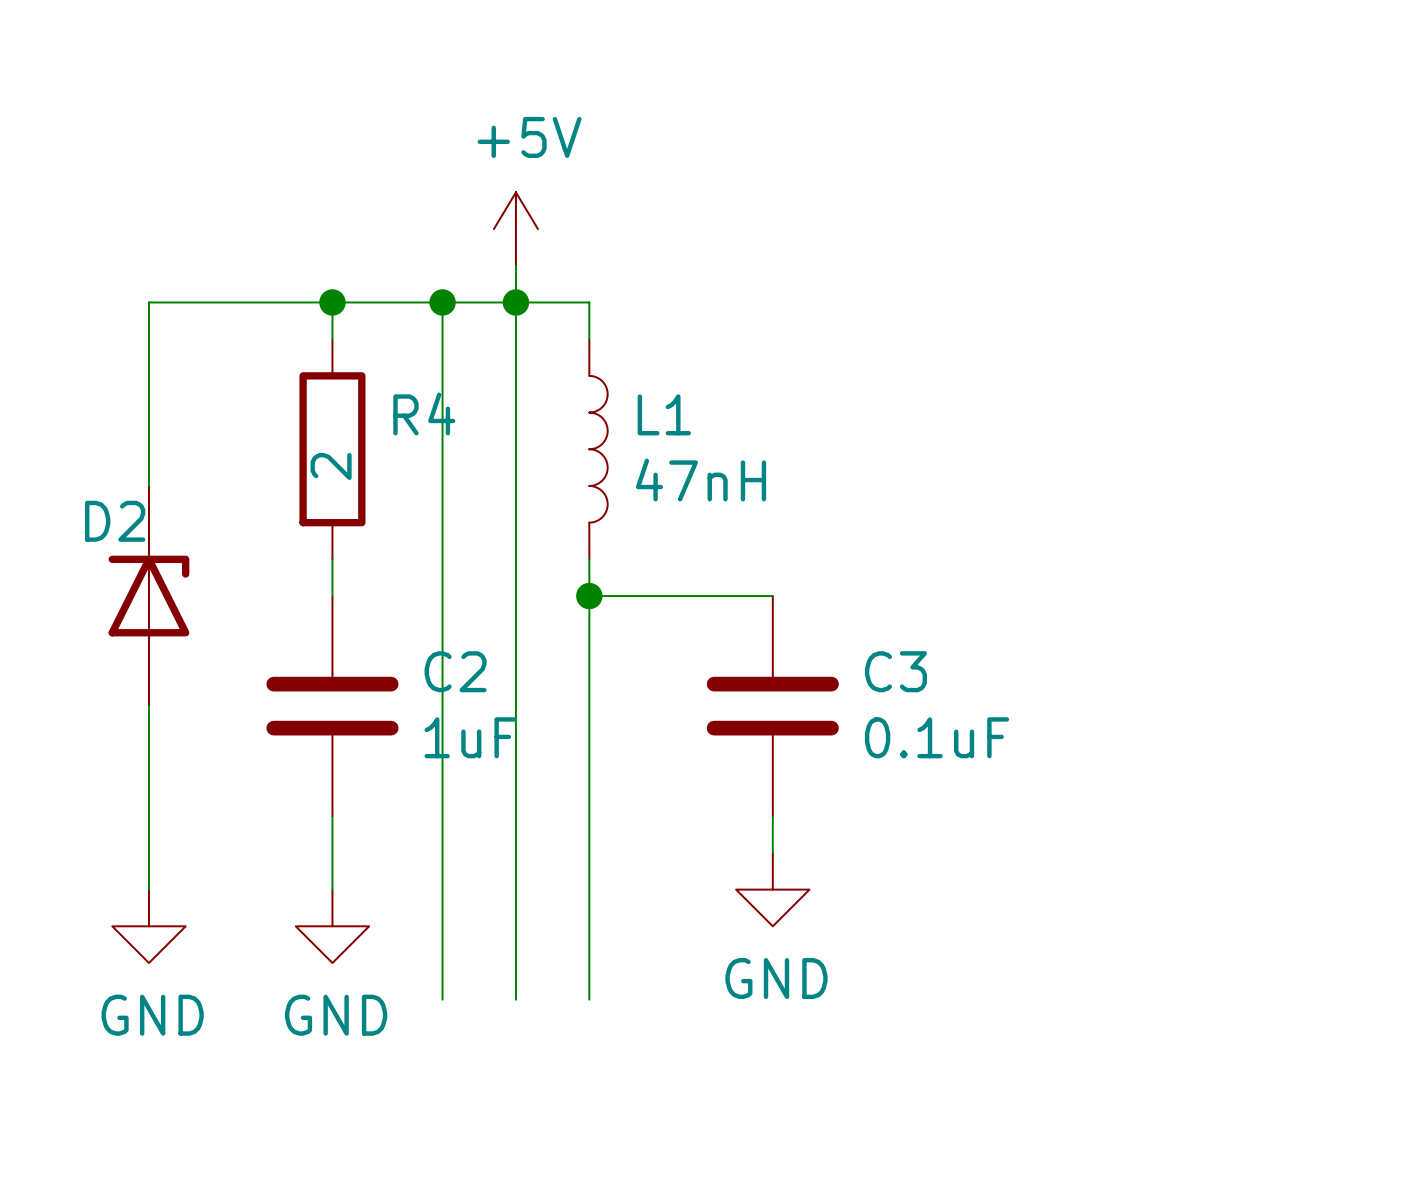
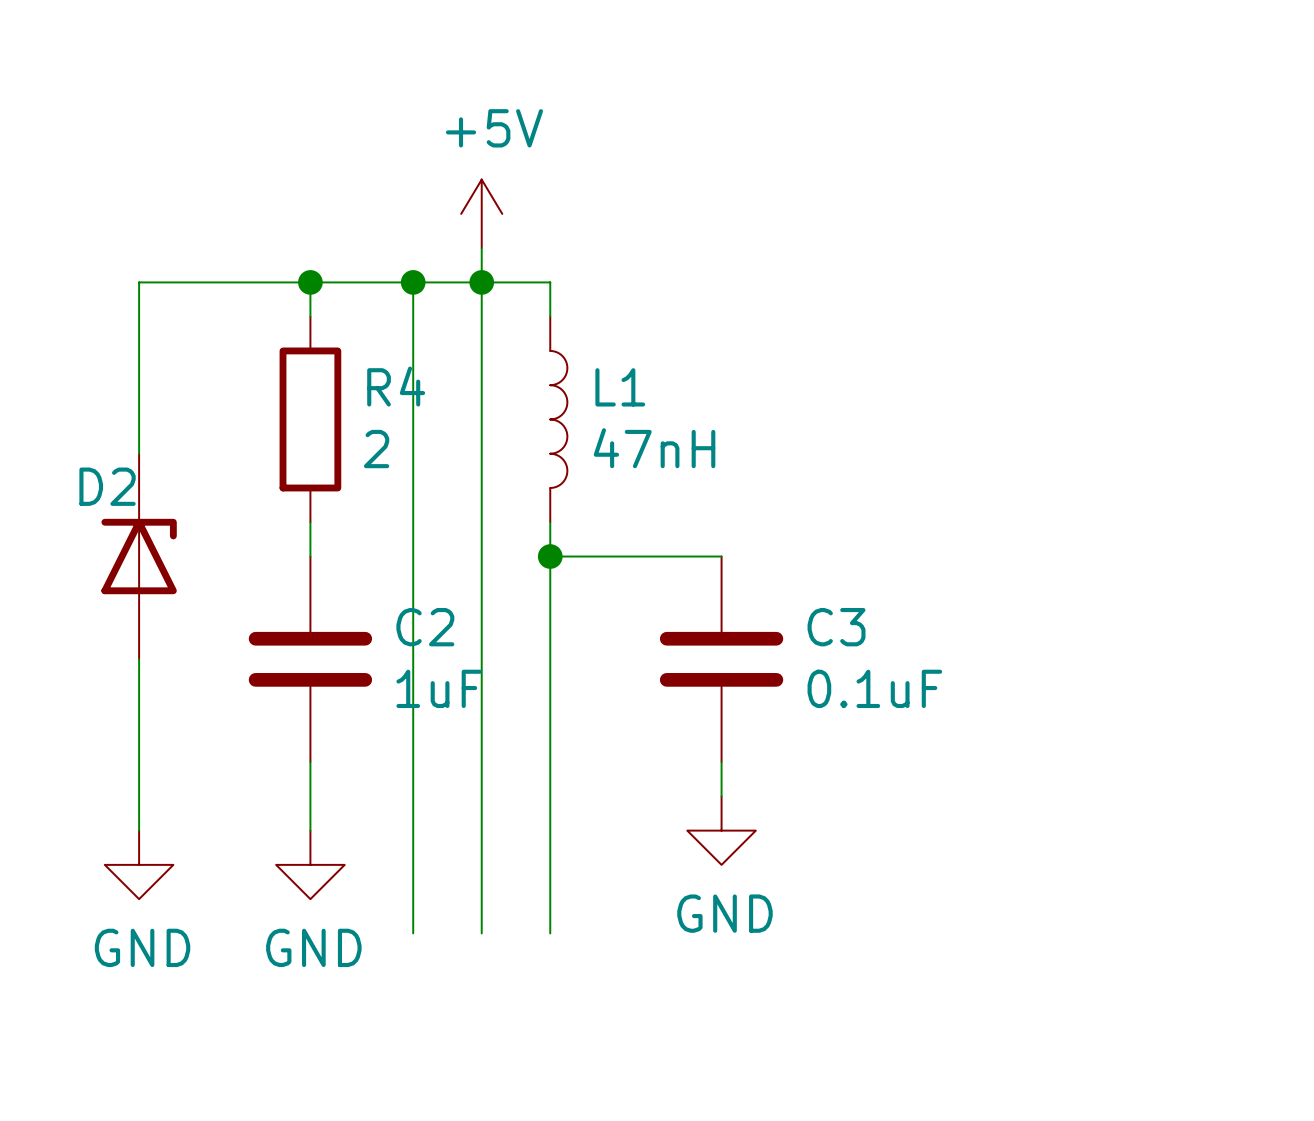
R4 value rotation: 0° (331, 466) -> 90° clockwise (376, 449)
R4 value position: 2 (331, 466) -> 2 (376, 449)

